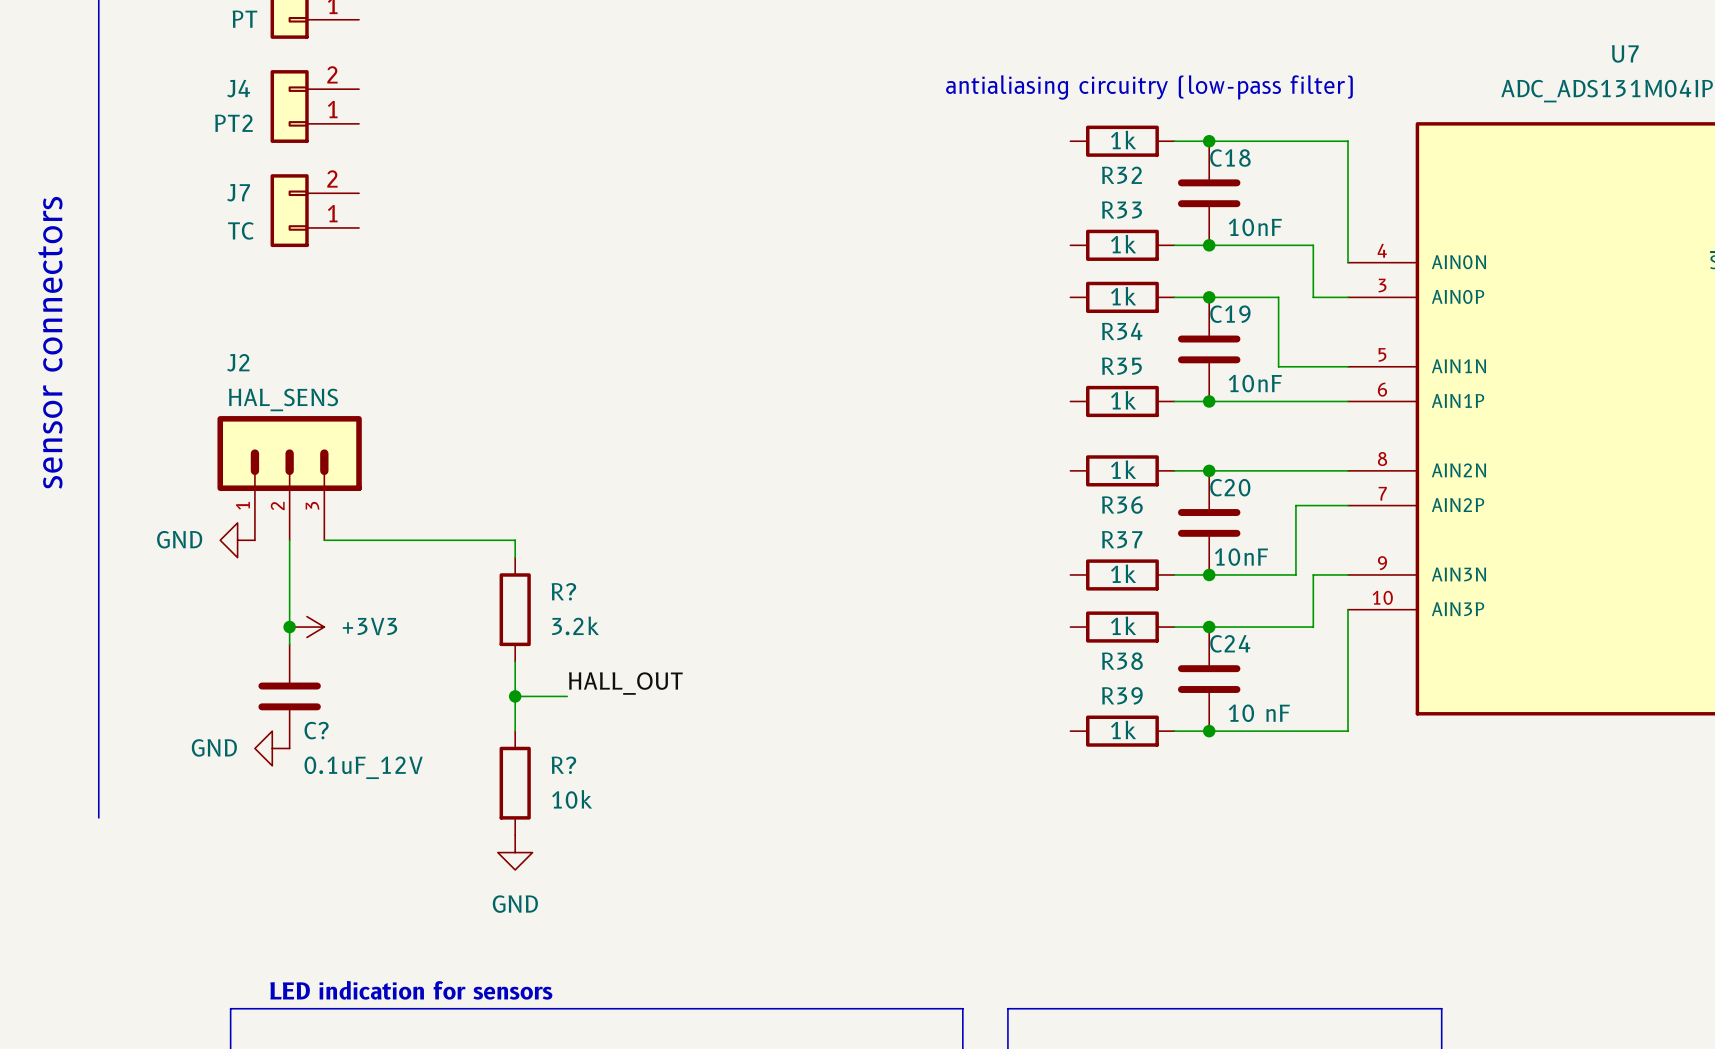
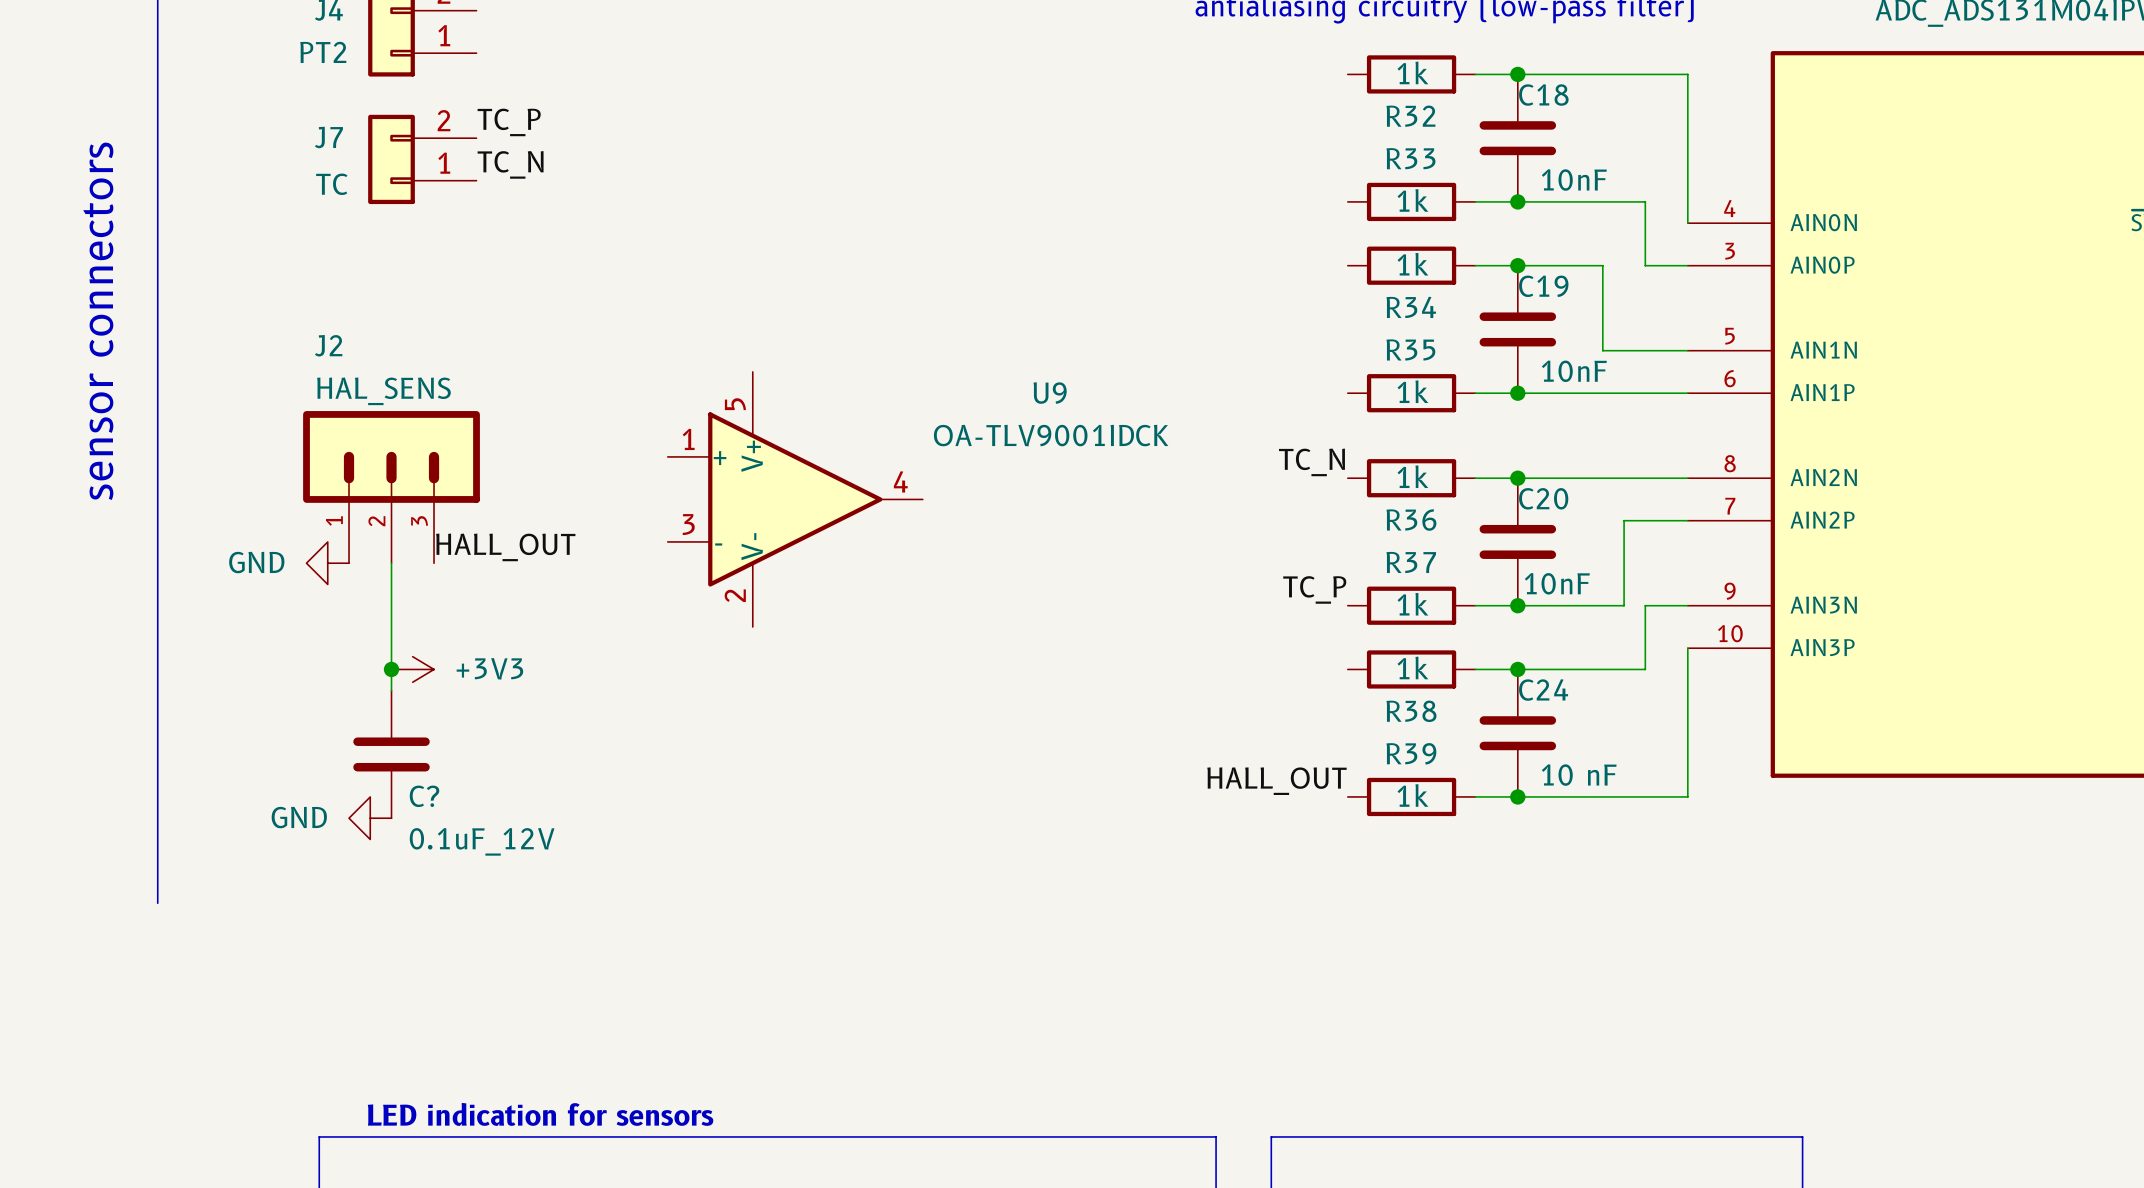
label: none -> TC_P (509, 122)
label: none -> TC_N (510, 164)
label: none -> TC_N (1311, 462)
U9: none -> OA-TLV9001IDCK (795, 499)
label: none -> HALL_OUT (505, 547)
wire: (324, 540) (515, 540) (515, 557) -> none
label: none -> TC_P (1314, 589)
R?: 3.2k (515, 609) -> none
wire: (515, 661) (515, 731) -> none
label: HALL_OUT (625, 683) -> none
wire: (515, 696) (567, 696) -> none
junction: (515, 696) -> none
label: none -> HALL_OUT (1276, 781)
R?: 10k (515, 783) -> none
power symbol: GND (515, 852) -> none

